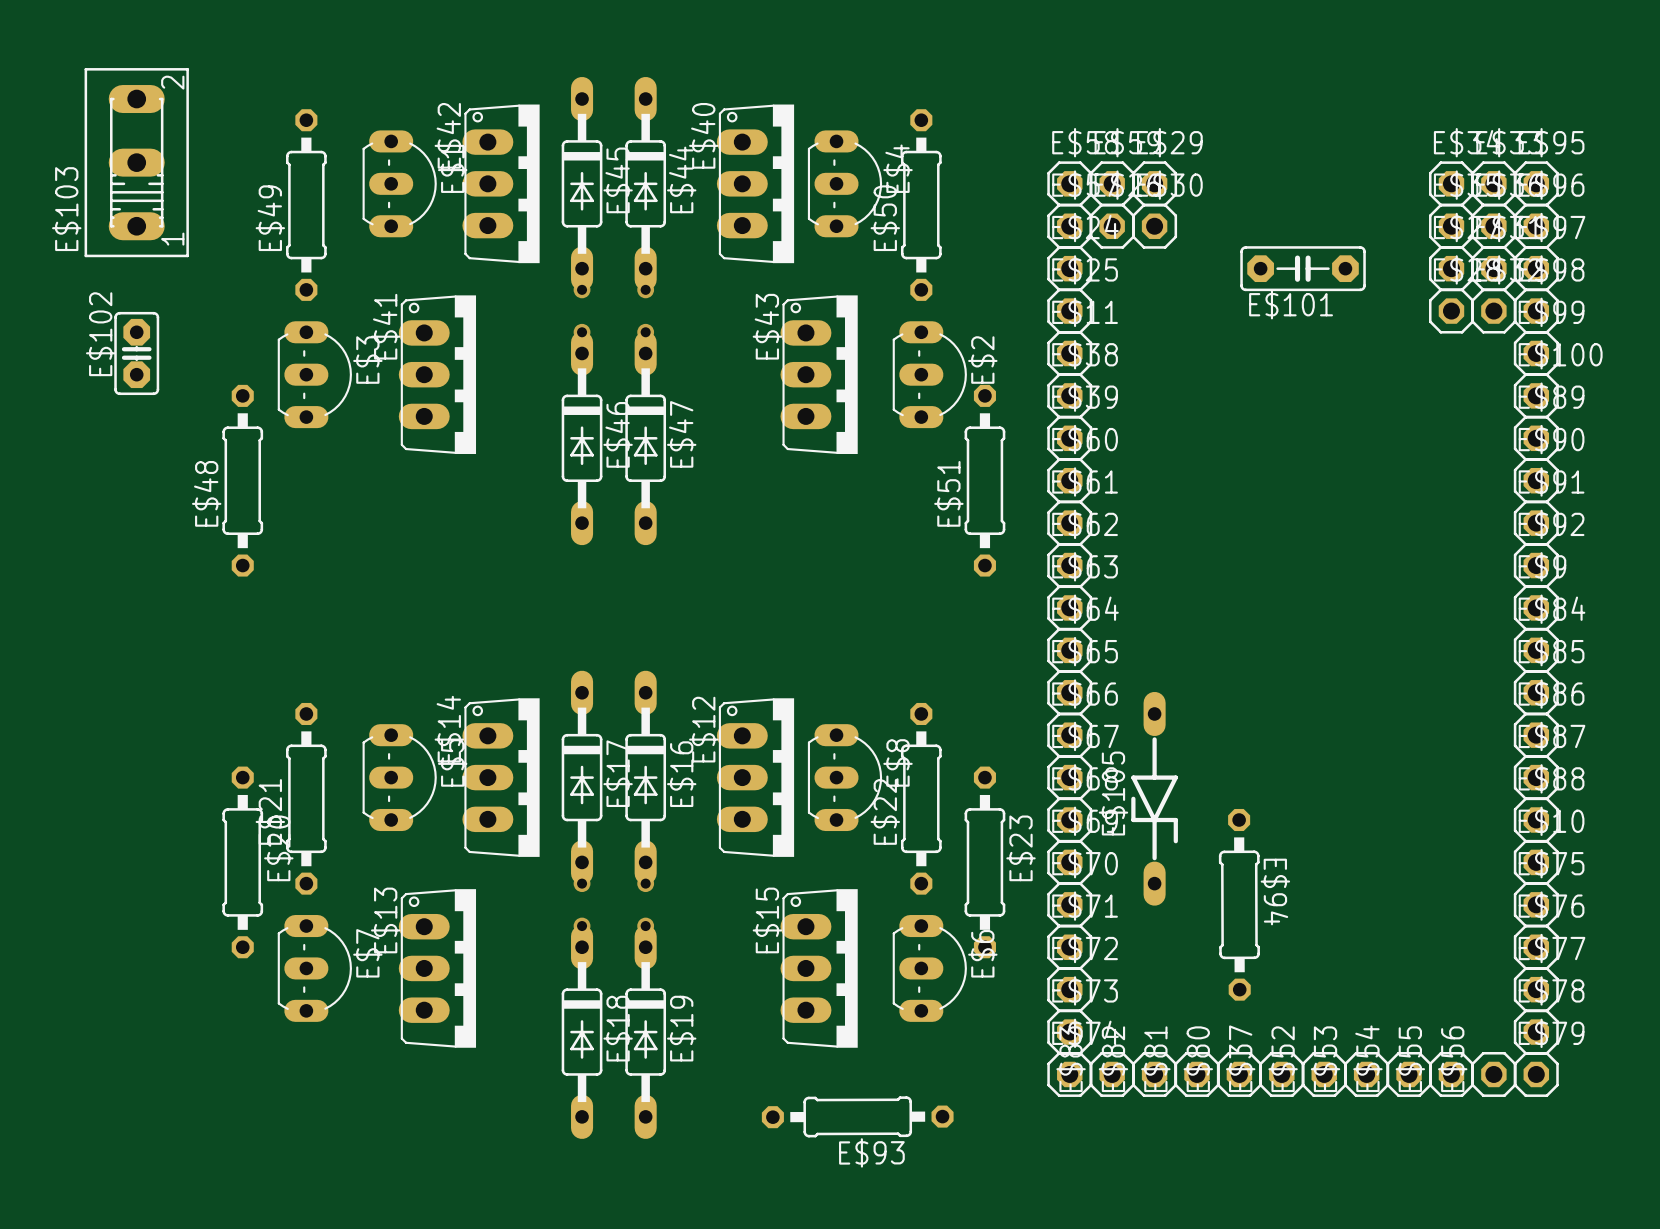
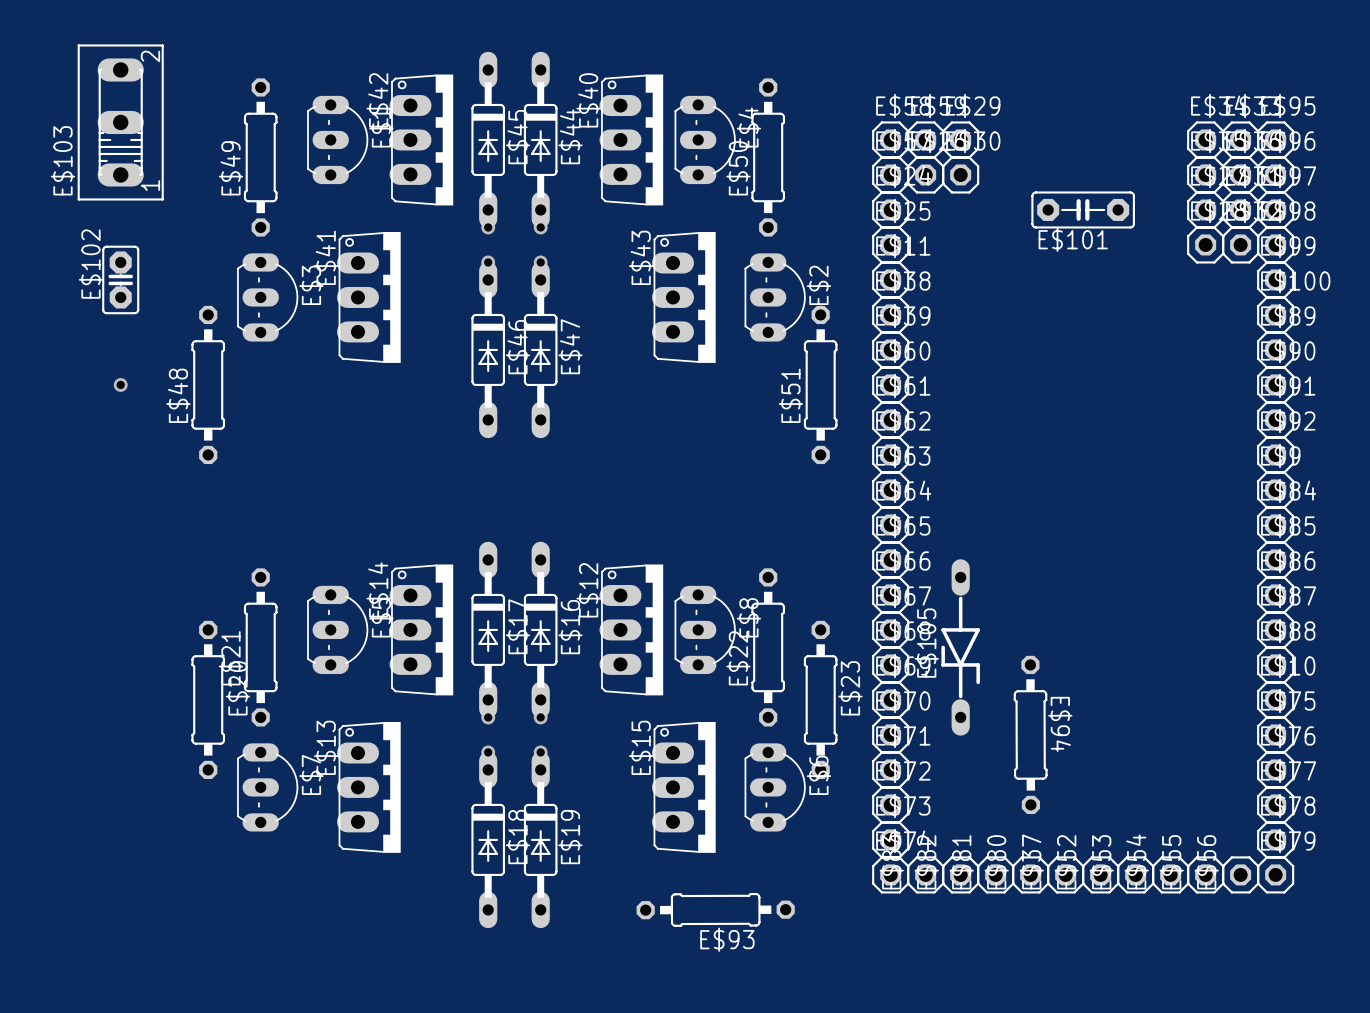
via: none -> (120, 384)

